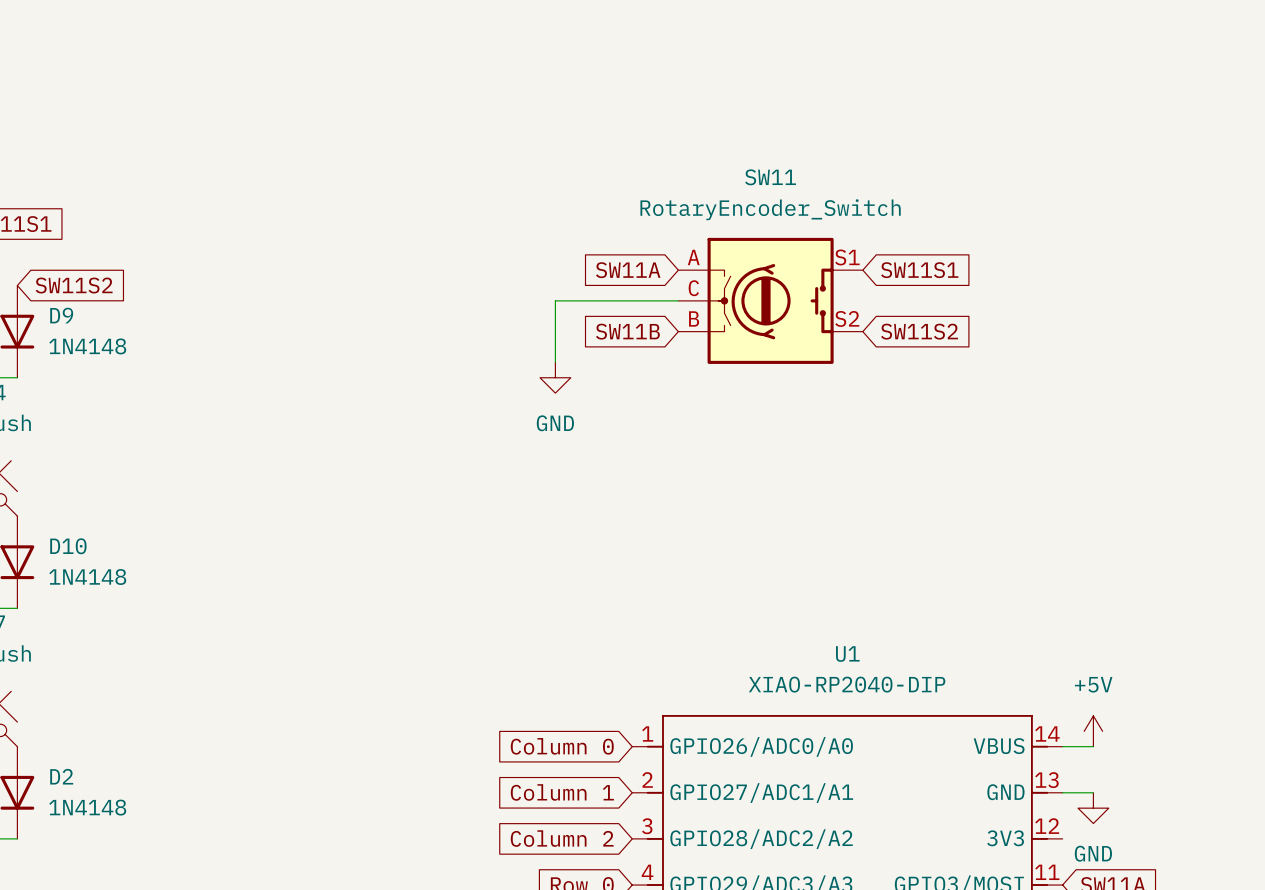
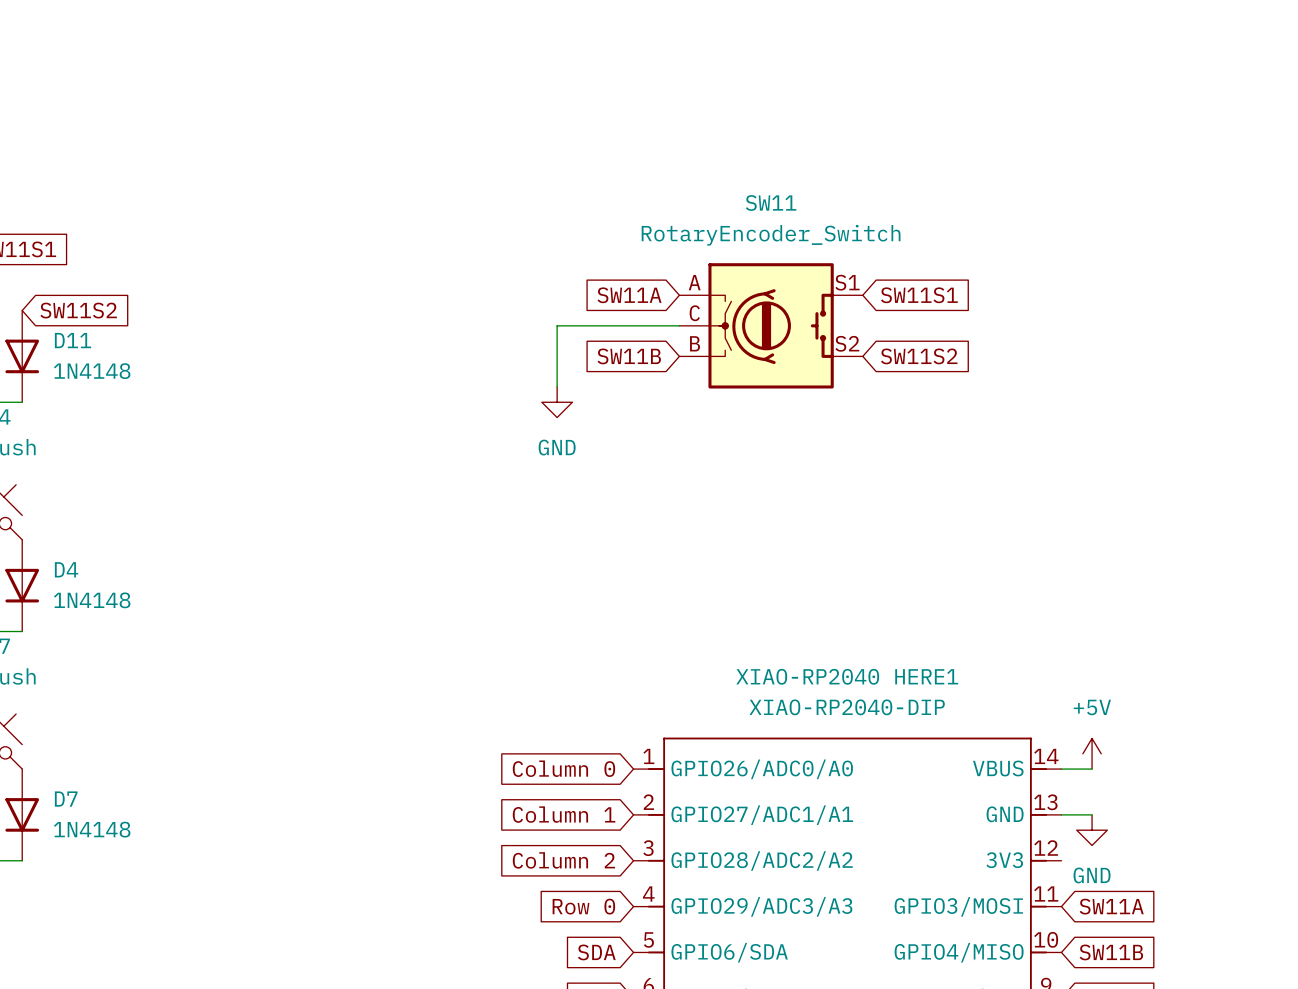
D9 name: D9 (61, 315) -> D11 (73, 340)
D10 name: D10 (68, 546) -> D4 (66, 569)
U1 name: U1 (847, 654) -> XIAO-RP2040 HERE1 (847, 676)
D2 name: D2 (61, 776) -> D7 (66, 799)

